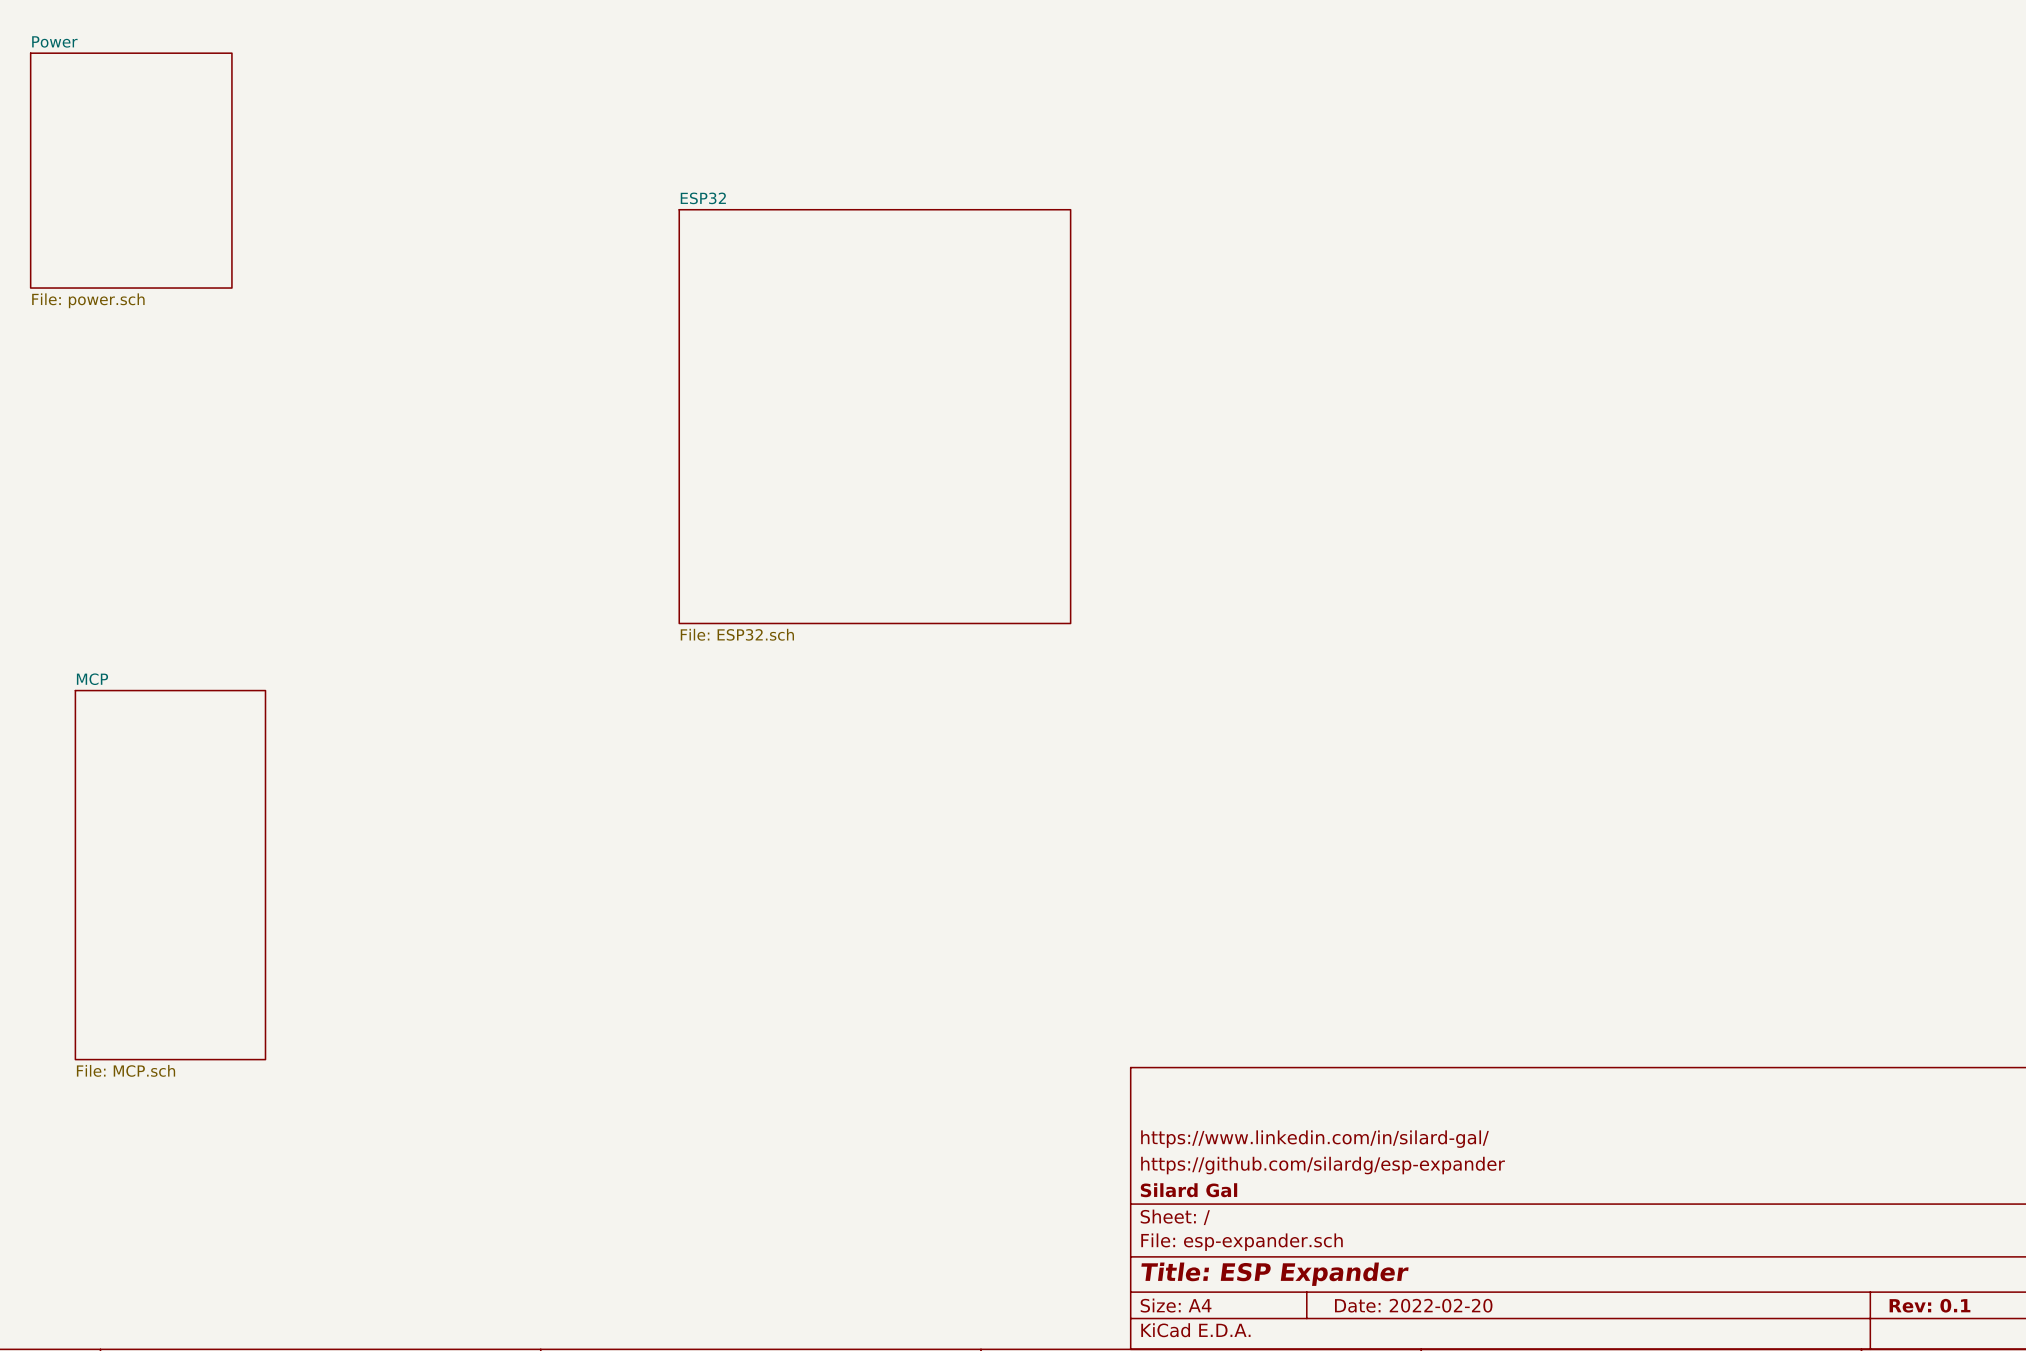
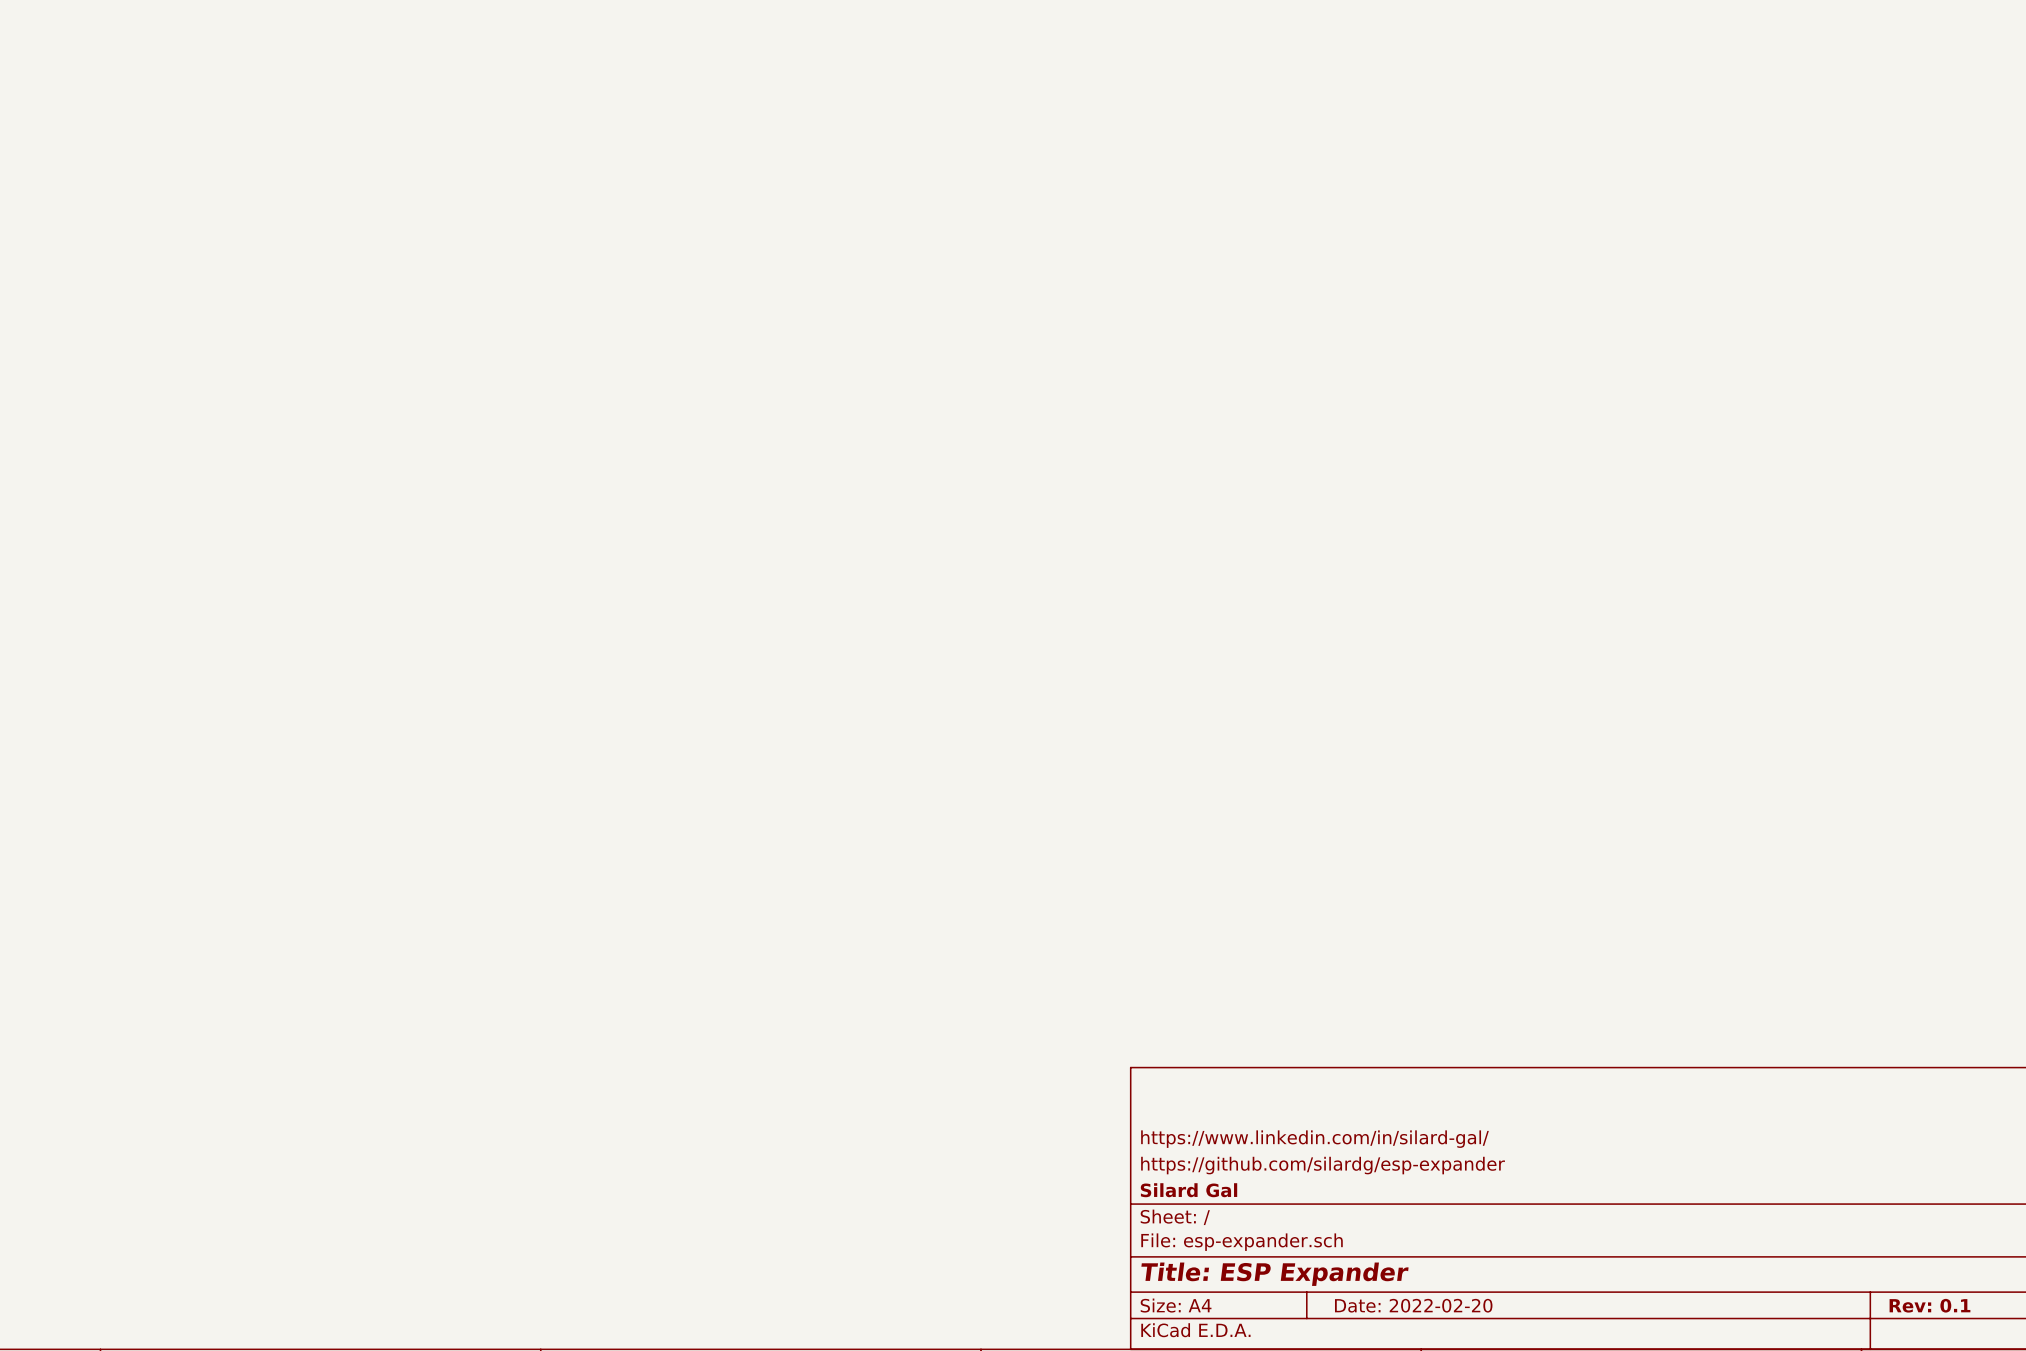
sheet Power: File: power.sch (131, 170) -> none
sheet ESP32: File: ESP32.sch (874, 416) -> none
sheet MCP: File: MCP.sch (170, 875) -> none

